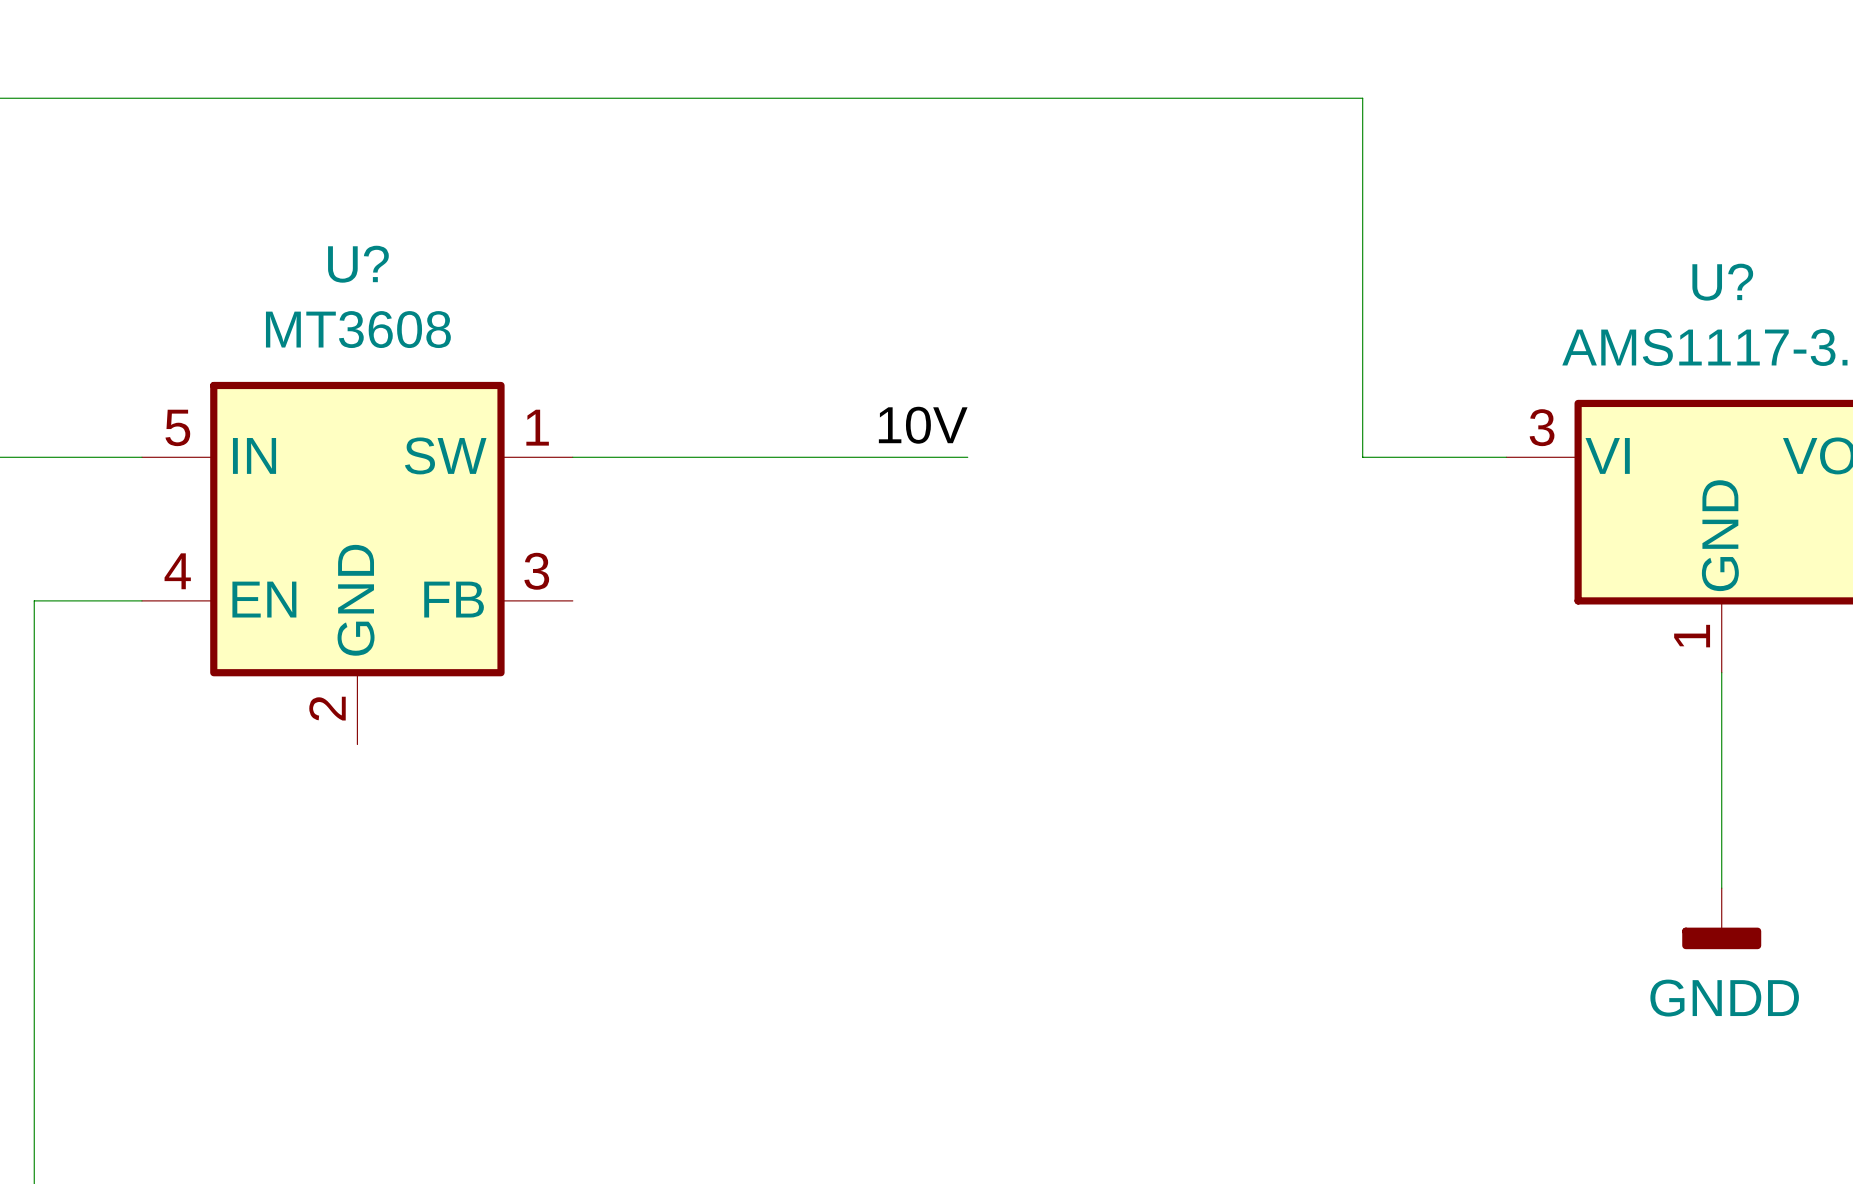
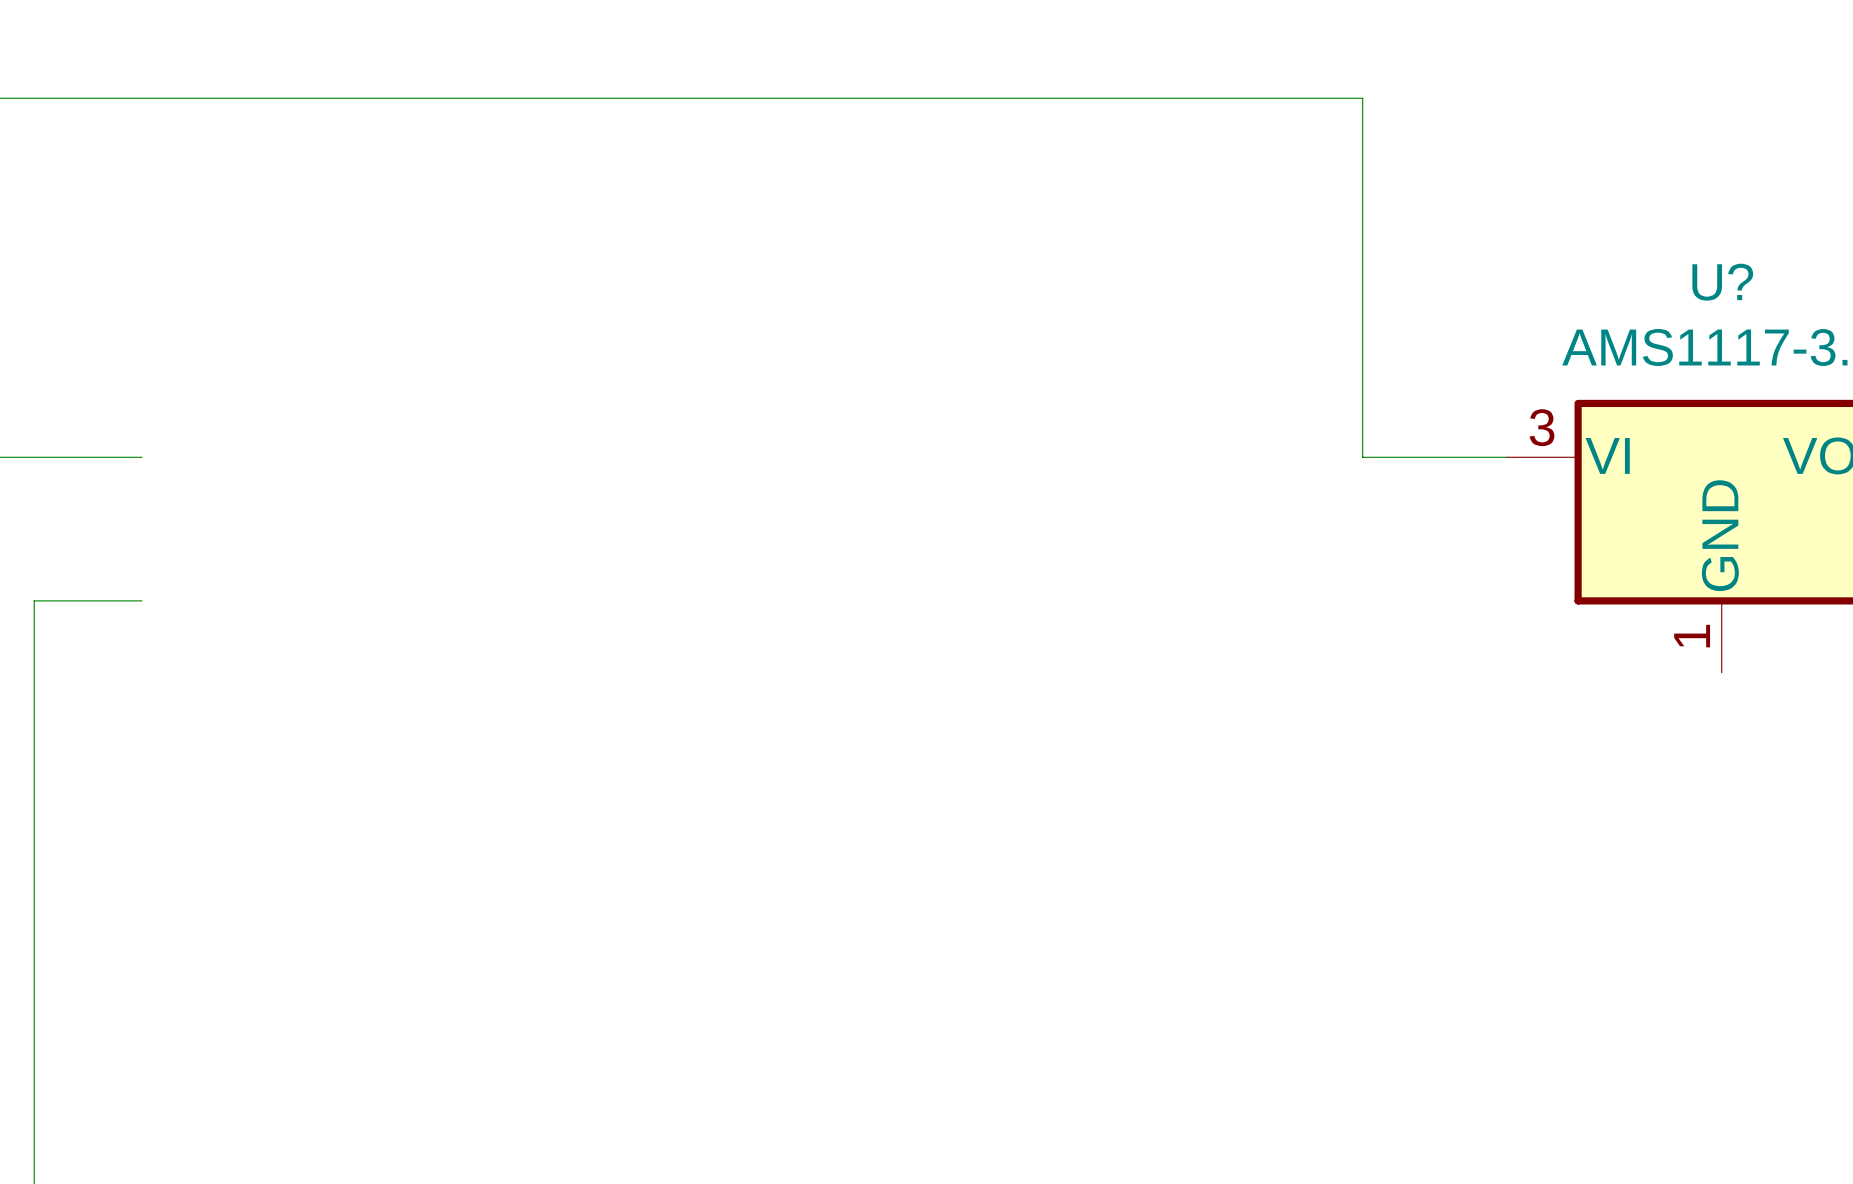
label: 10V (923, 425) -> none
wire: (572, 457) (967, 457) -> none
U?: MT3608 (357, 563) -> none
wire: (1721, 672) (1721, 888) -> none
power symbol: GNDD (1721, 918) -> none

